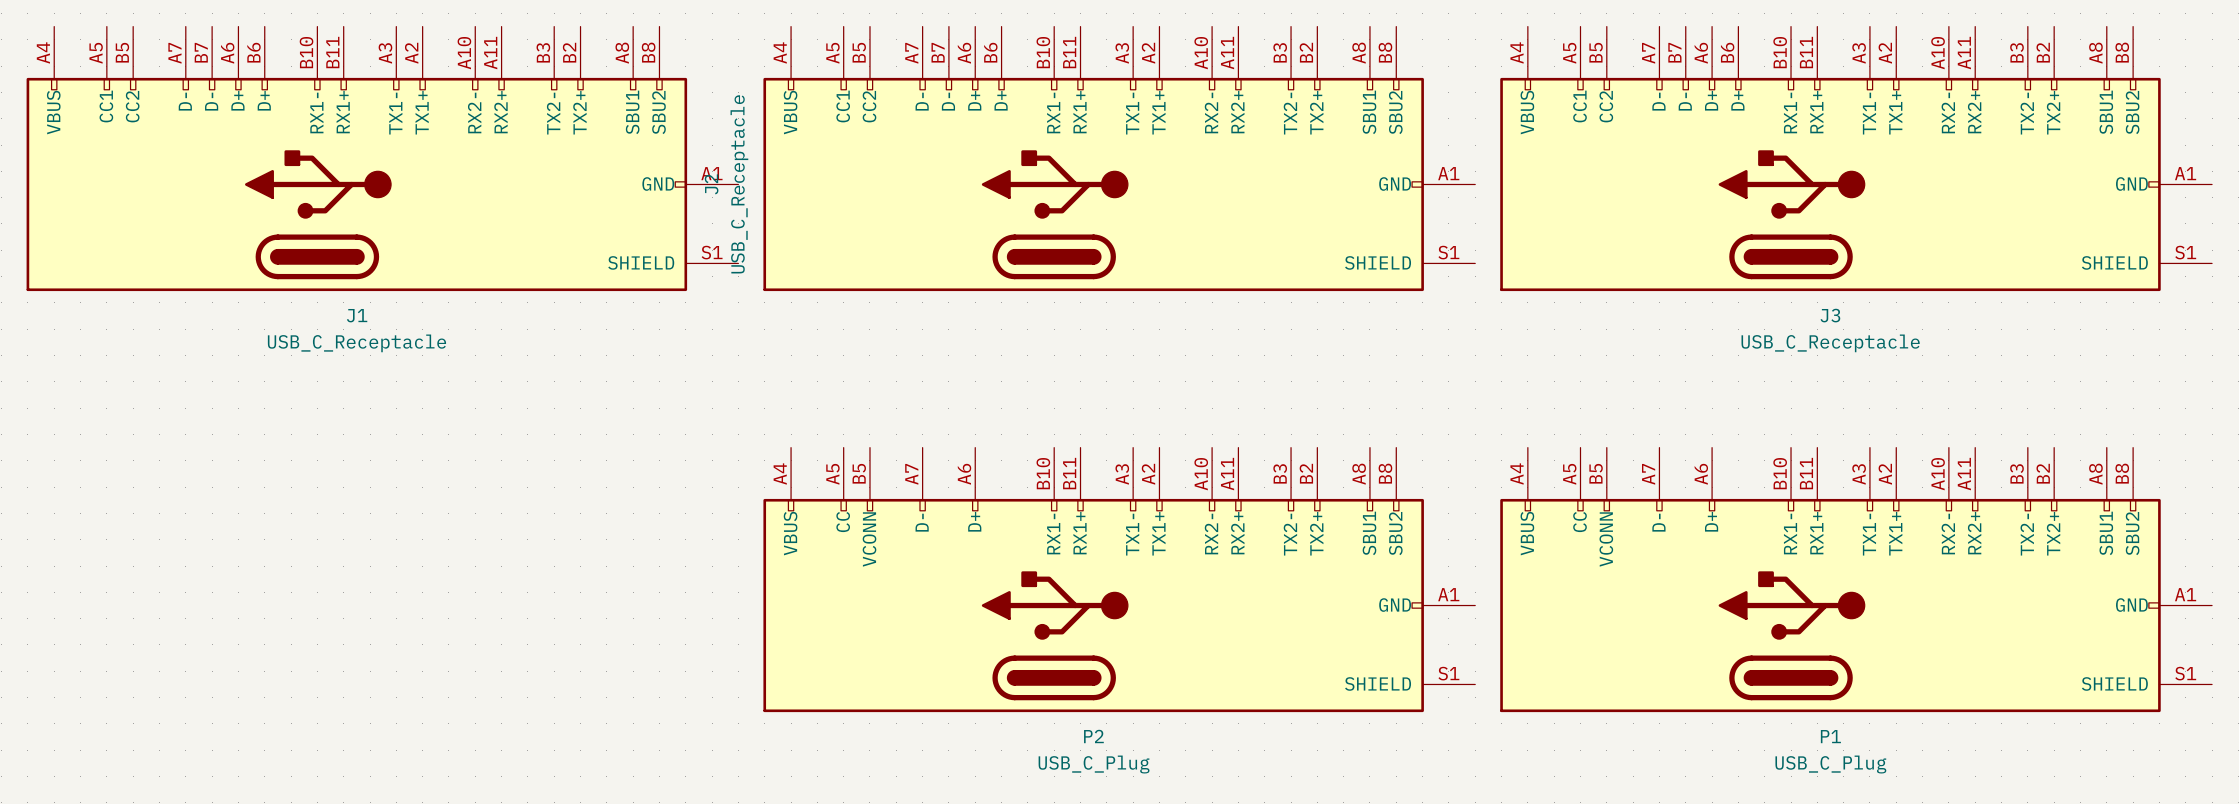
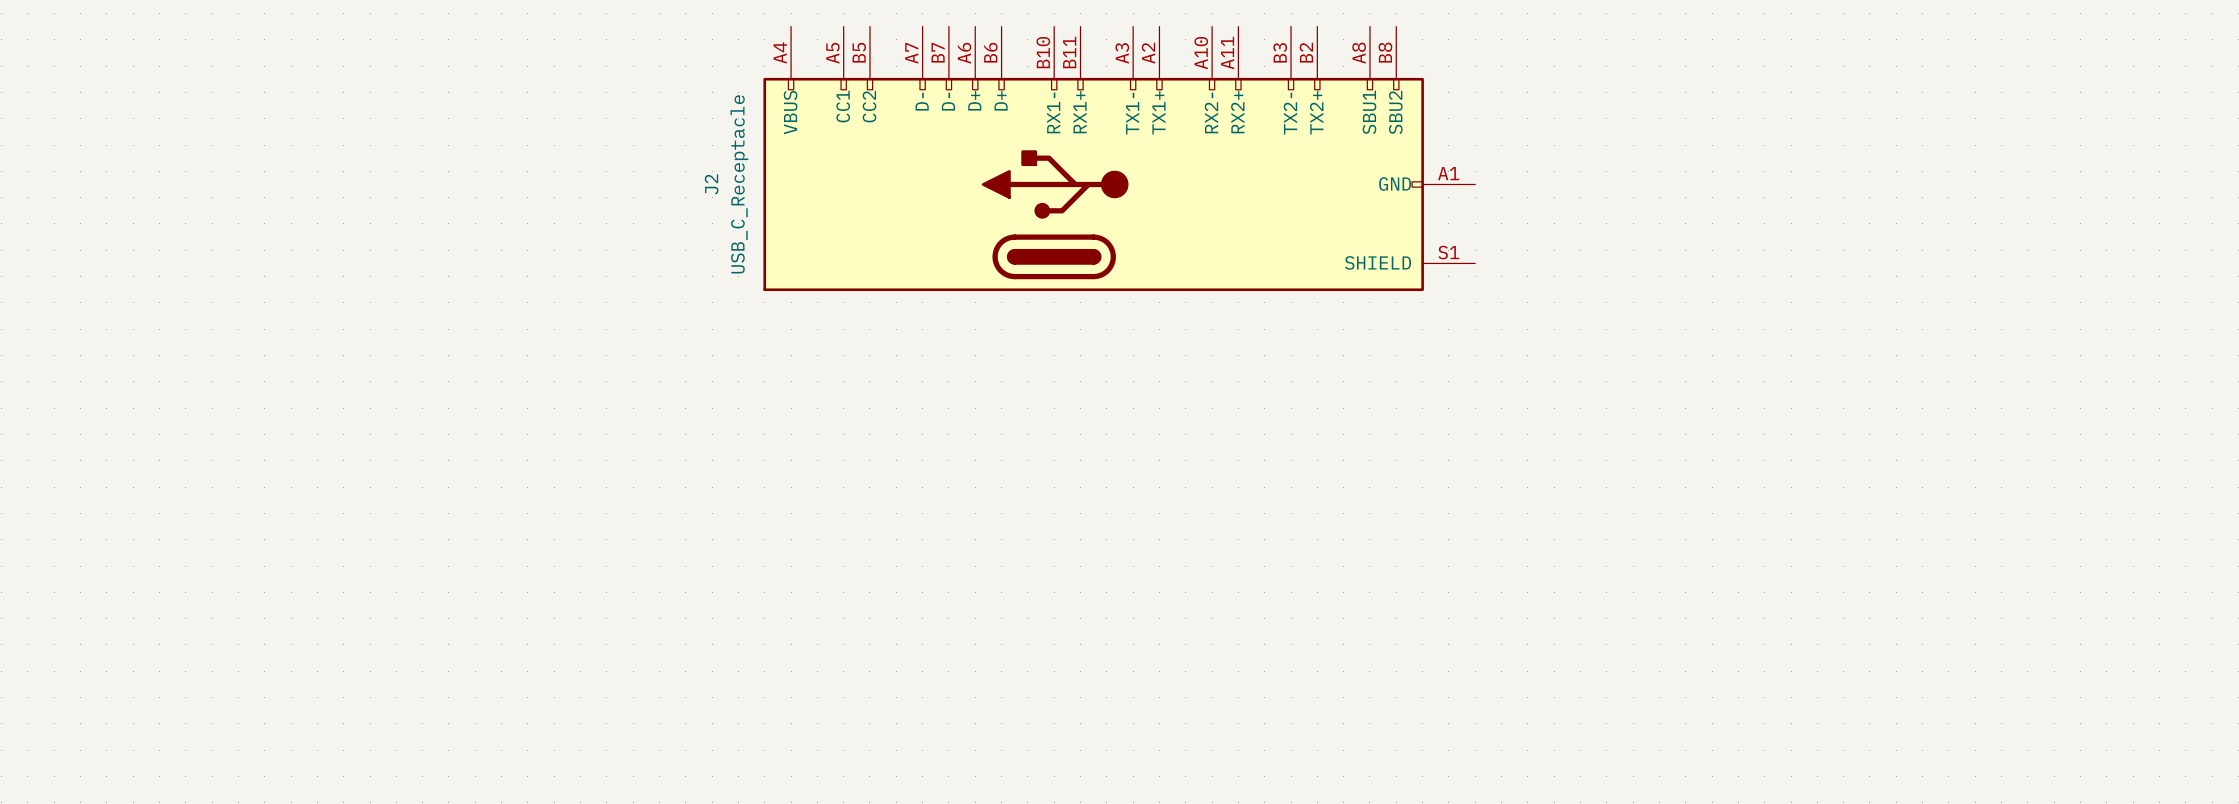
J1: USB_C_Receptacle (382, 158) -> none
J3: USB_C_Receptacle (1856, 158) -> none
P2: USB_C_Plug (1119, 579) -> none
P1: USB_C_Plug (1856, 579) -> none

